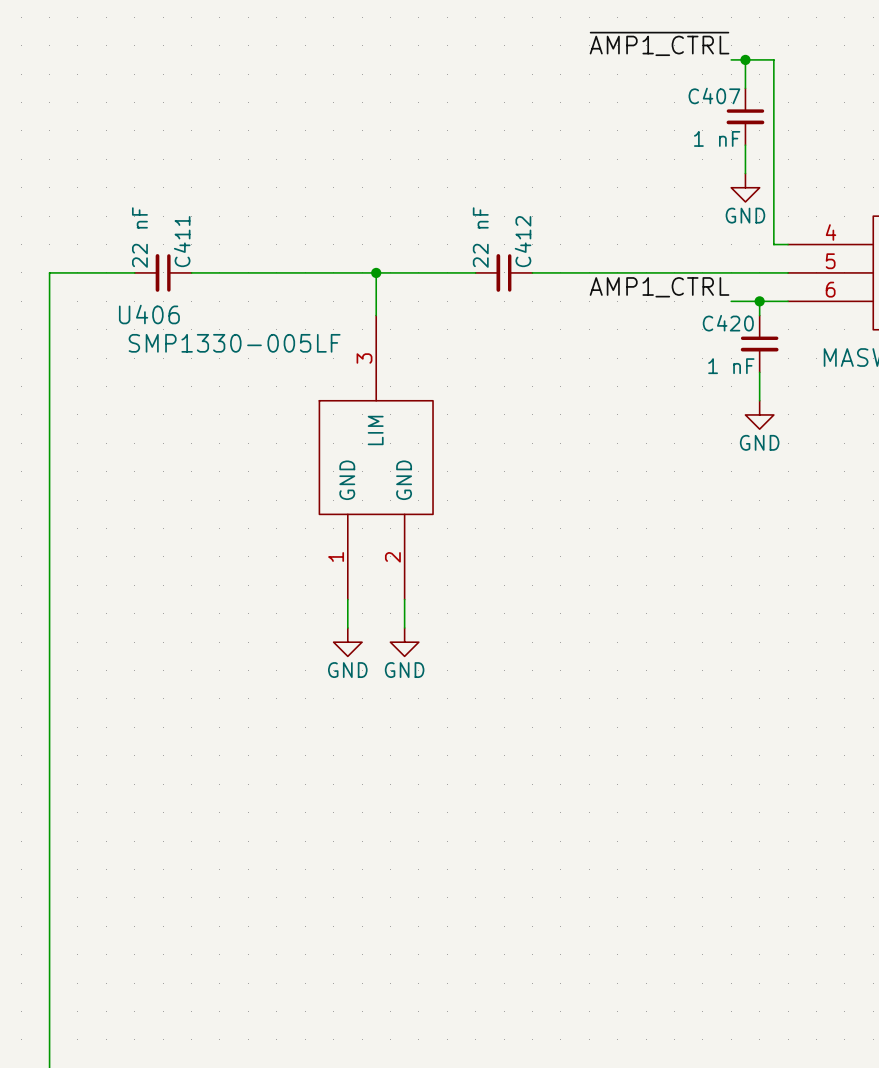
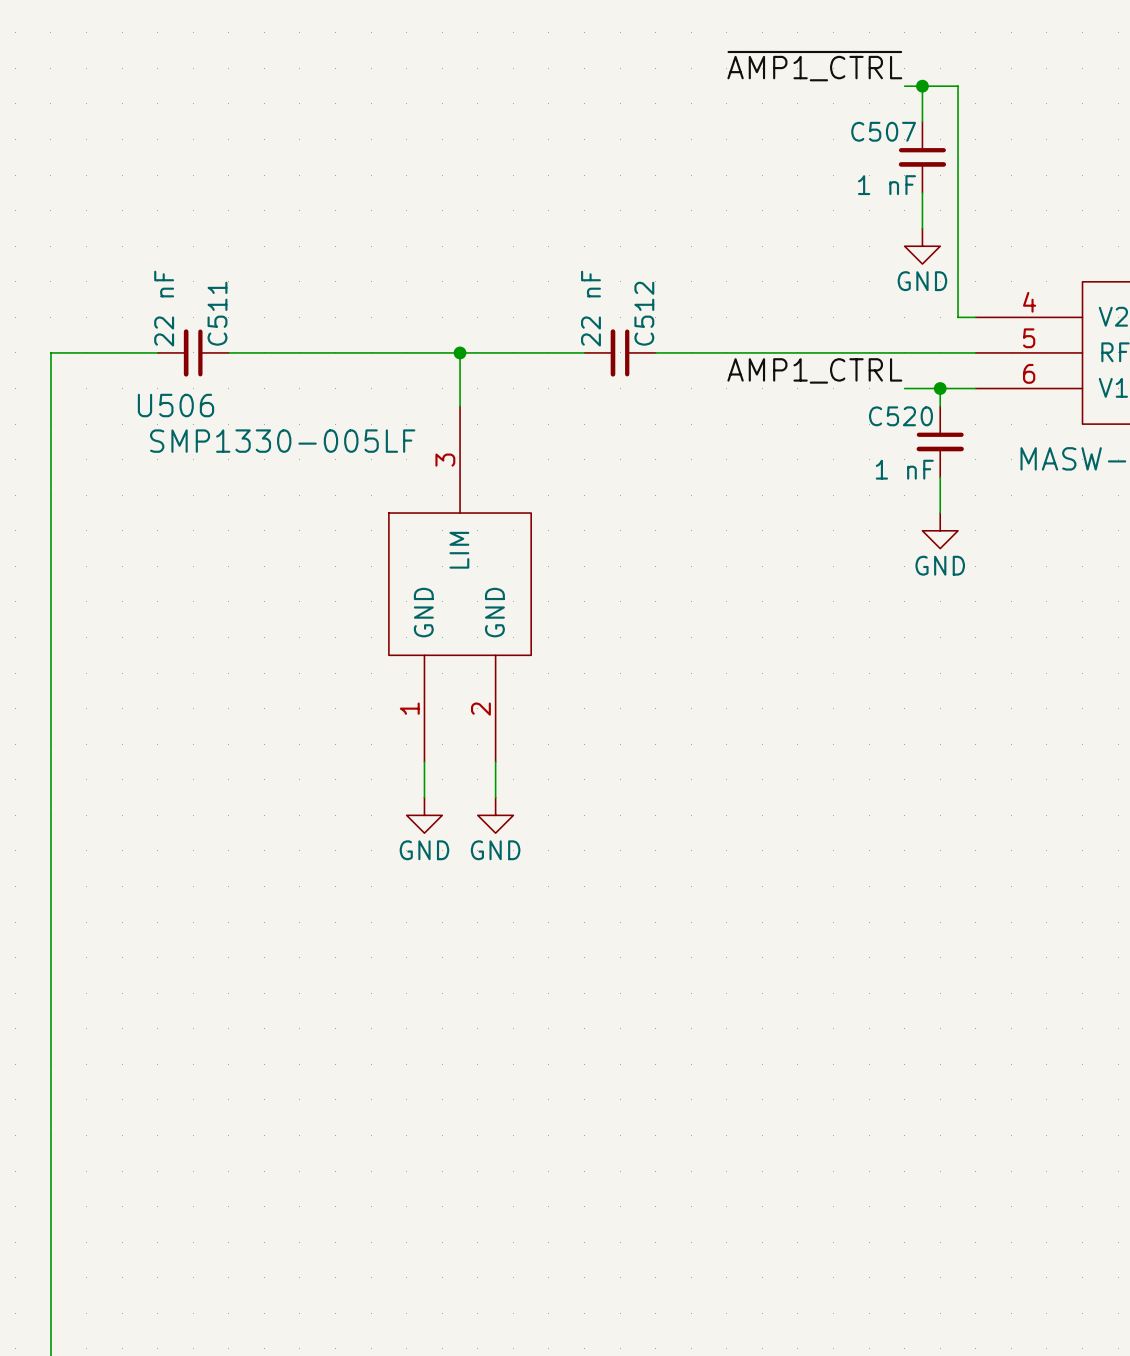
C407 name: C407 (714, 95) -> C507 (883, 131)
C411 name: C411 (182, 241) -> C511 (217, 313)
C412 name: C412 (523, 241) -> C512 (644, 313)
U406 name: U406 (149, 314) -> U506 (175, 405)
C420 name: C420 (728, 323) -> C520 (900, 416)

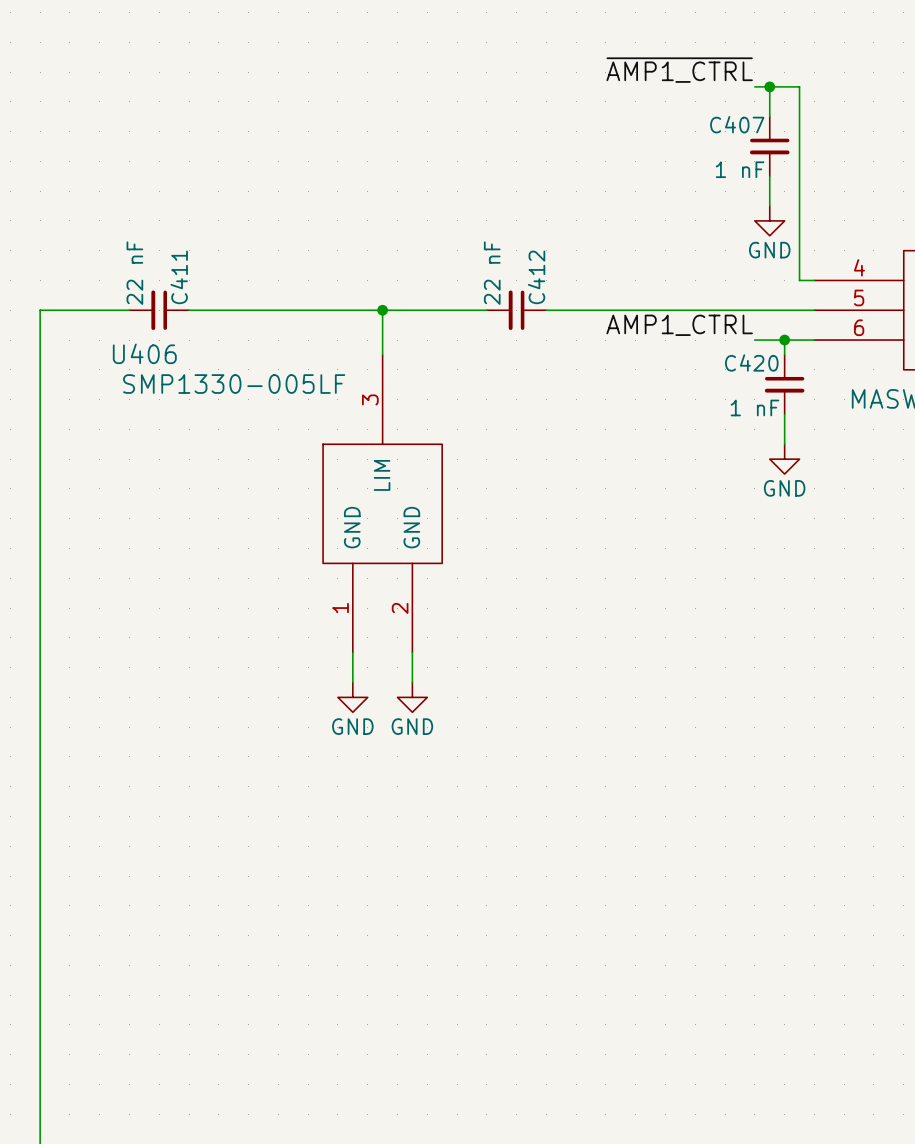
C507 name: C507 (883, 131) -> C407 (737, 124)
C511 name: C511 (217, 313) -> C411 (179, 277)
C512 name: C512 (644, 313) -> C412 (536, 277)
U506 name: U506 (175, 405) -> U406 (144, 353)
C520 name: C520 (900, 416) -> C420 (751, 362)

